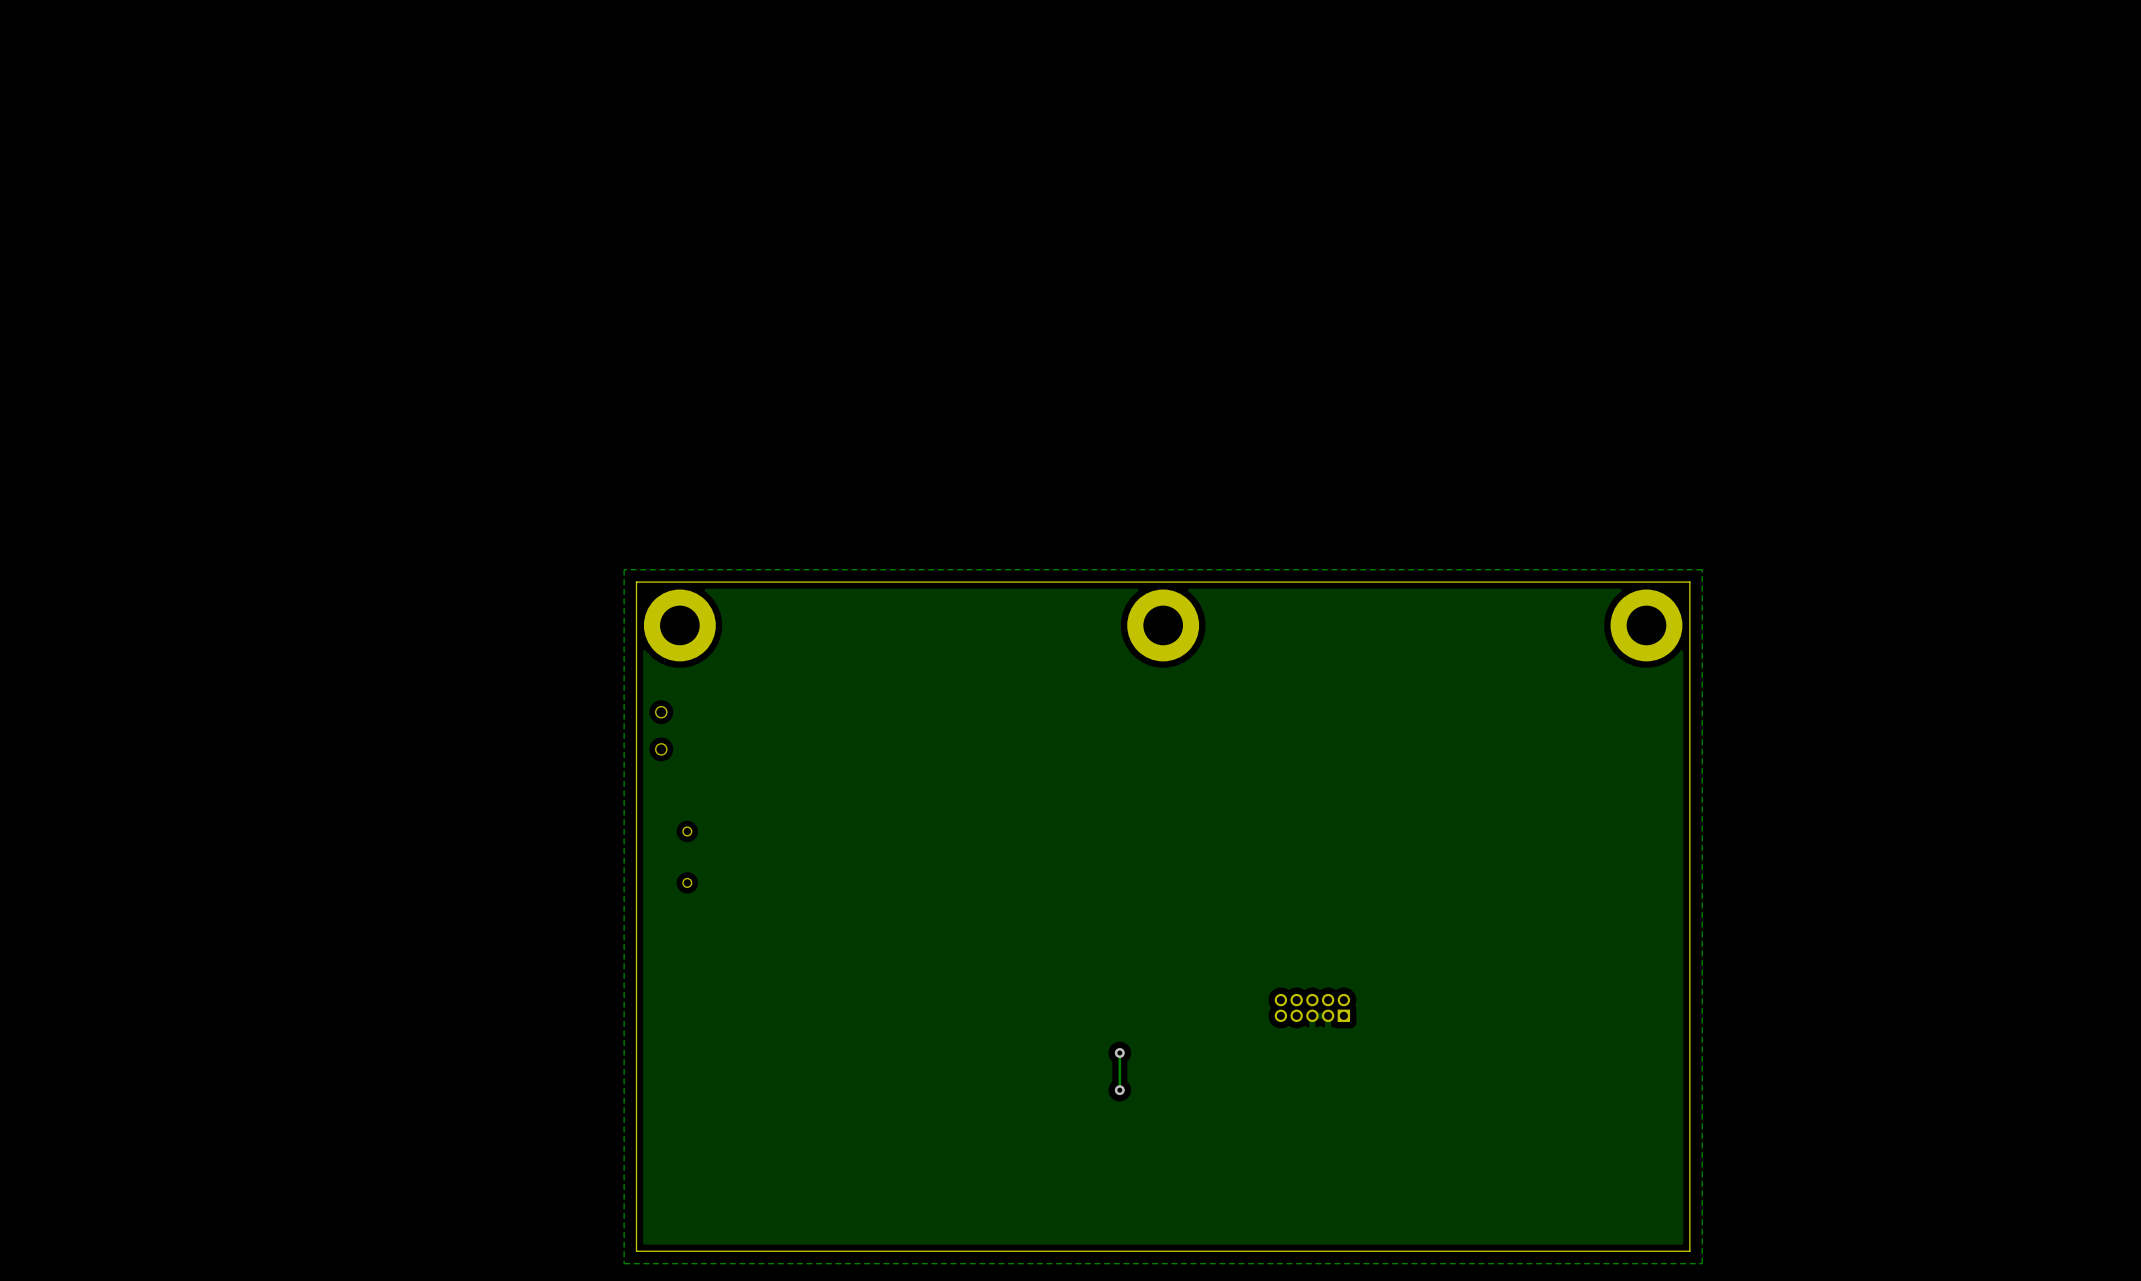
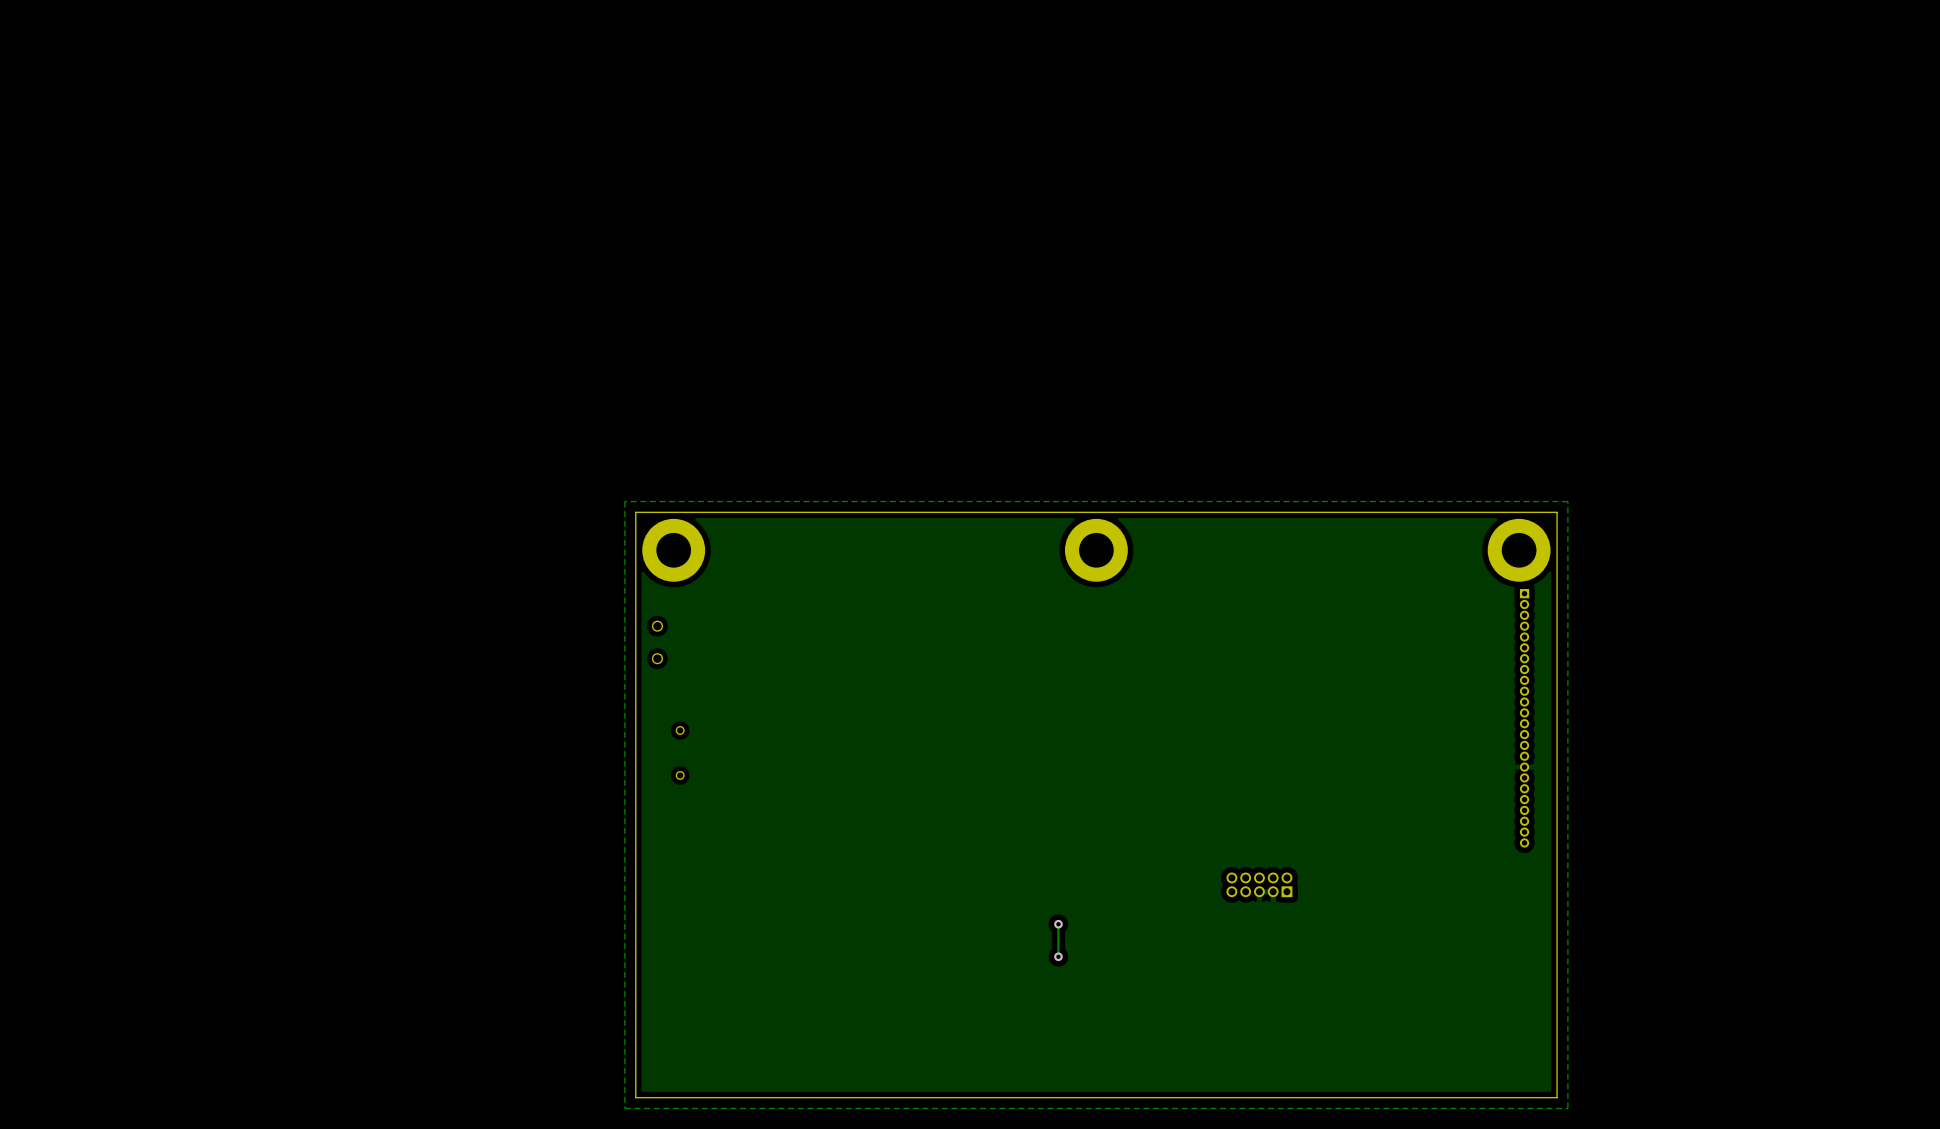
part: none -> (1524, 718)
part position: (1312, 1007) -> (1259, 884)

